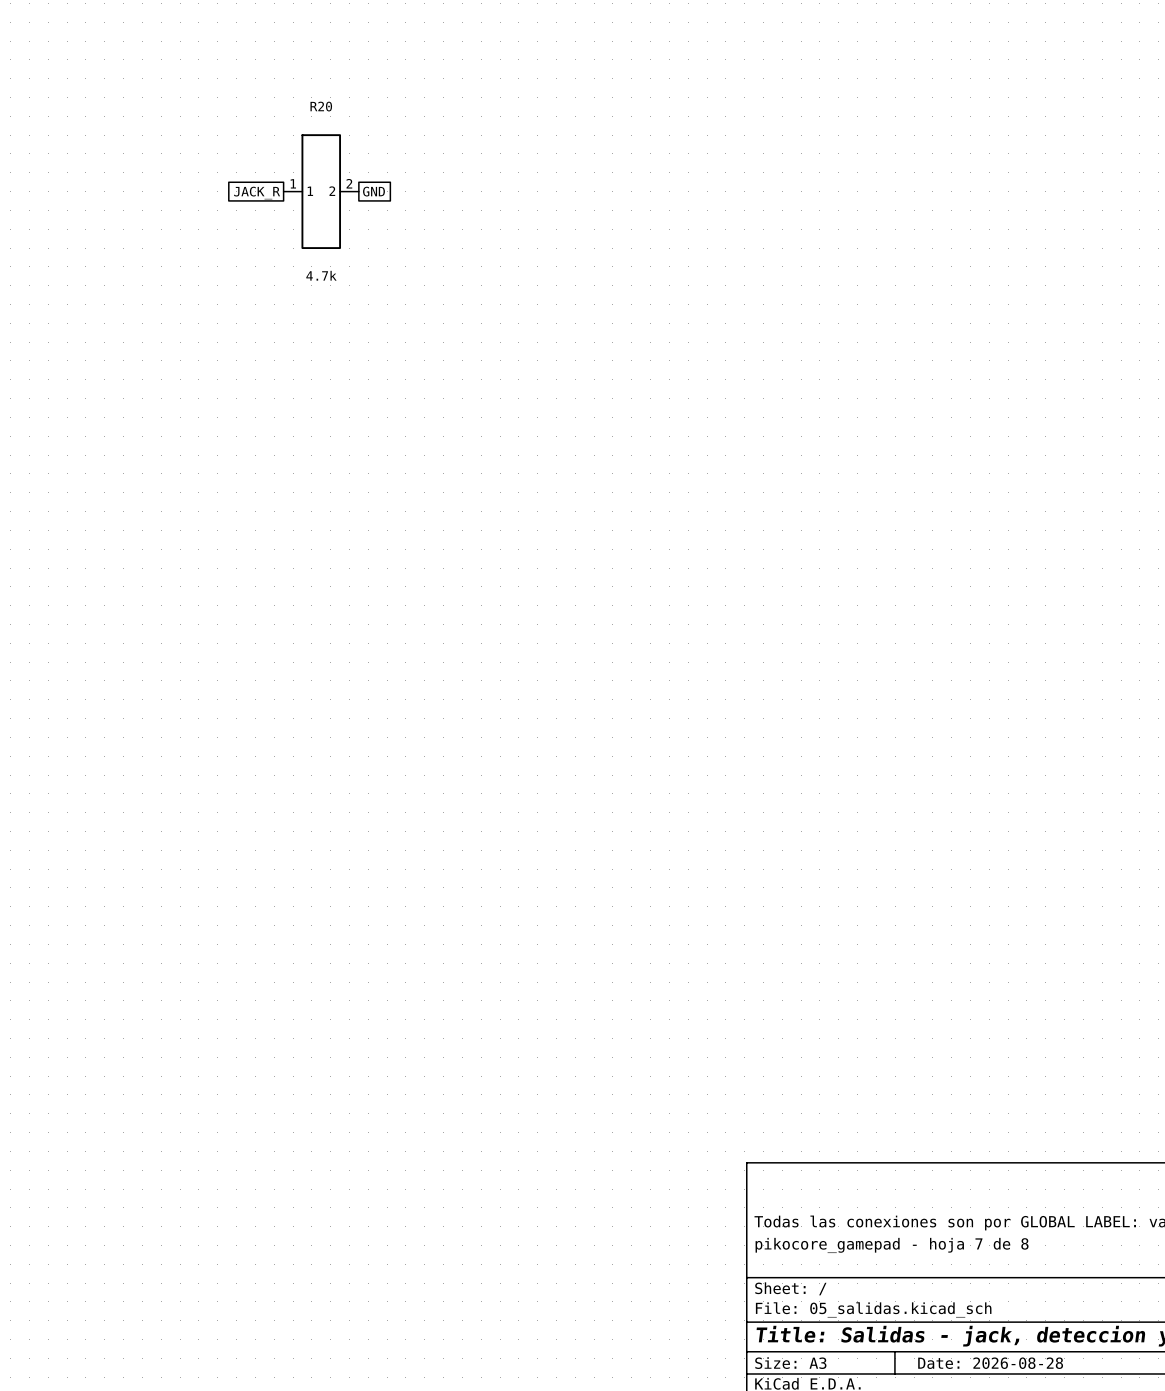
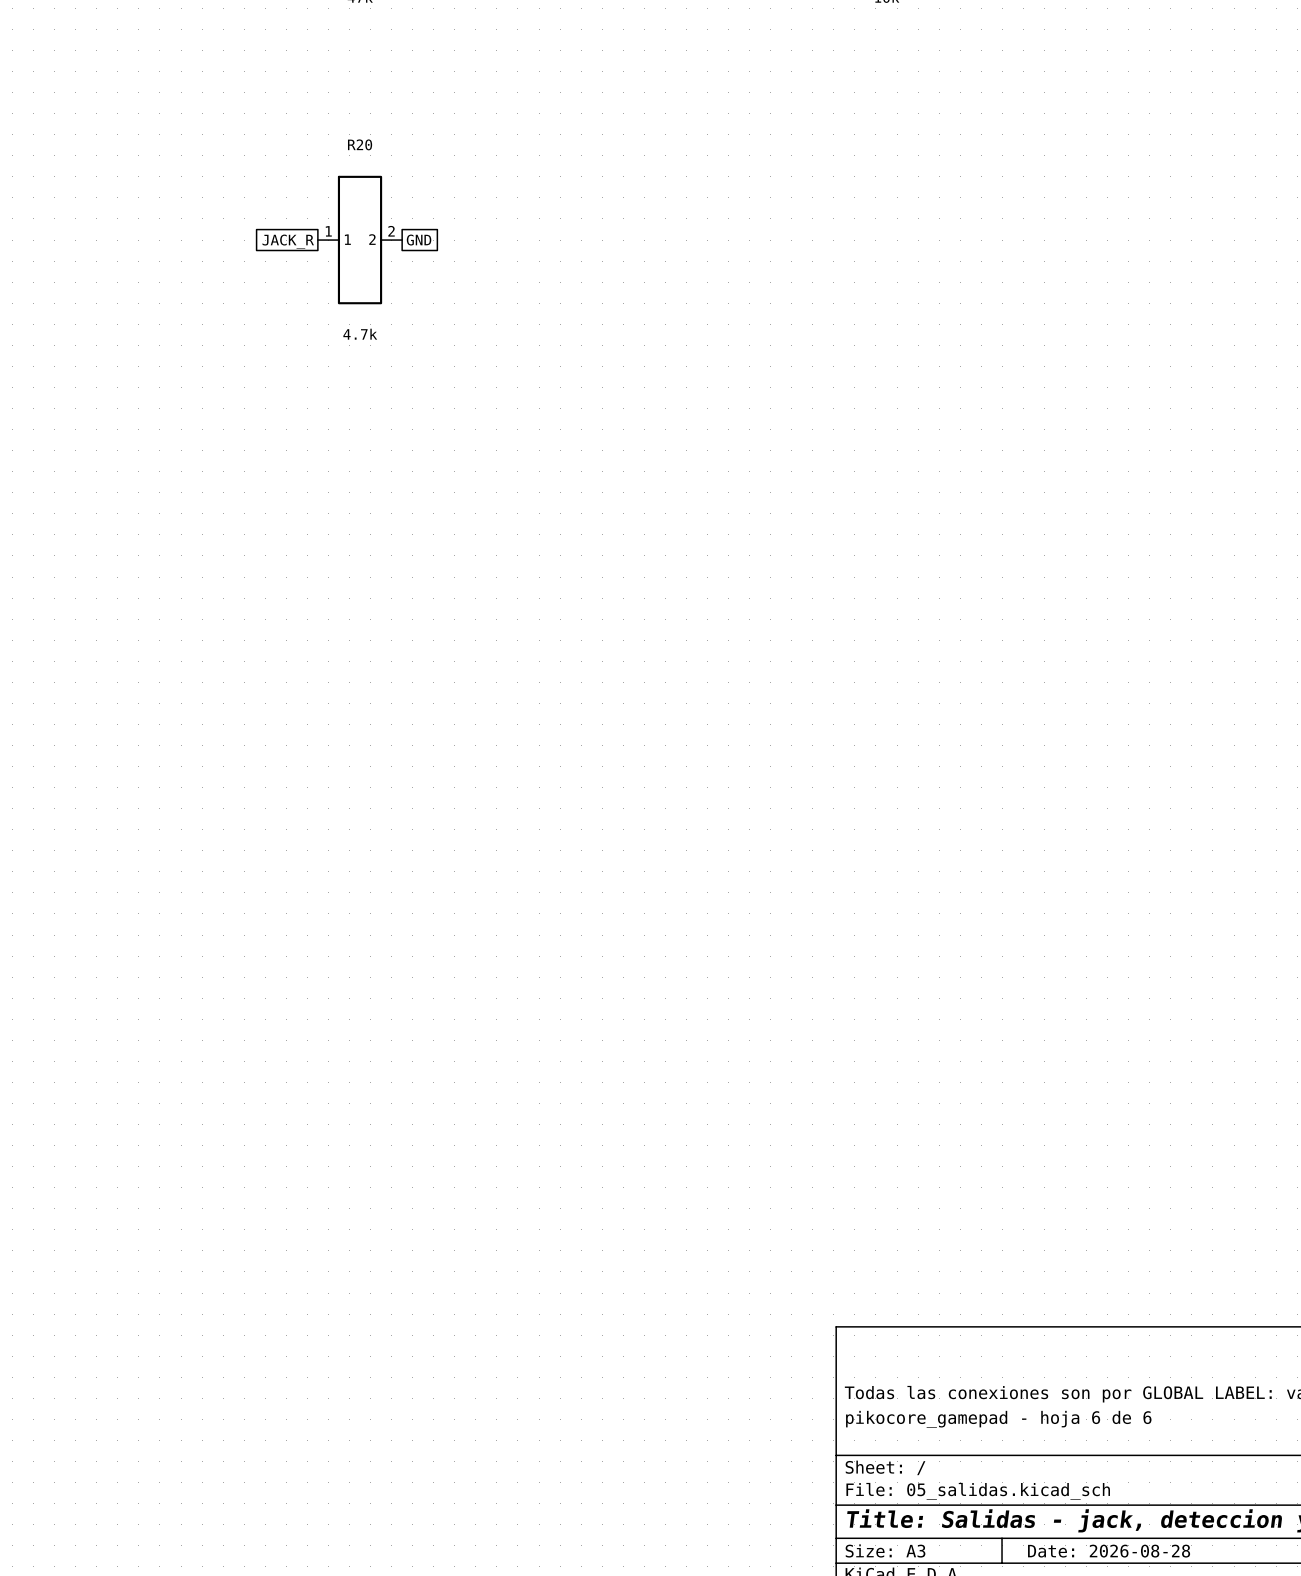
title block: pikocore_gamepad - hoja 7 de 8 (892, 1245) -> pikocore_gamepad - hoja 6 de 6 (998, 1419)

